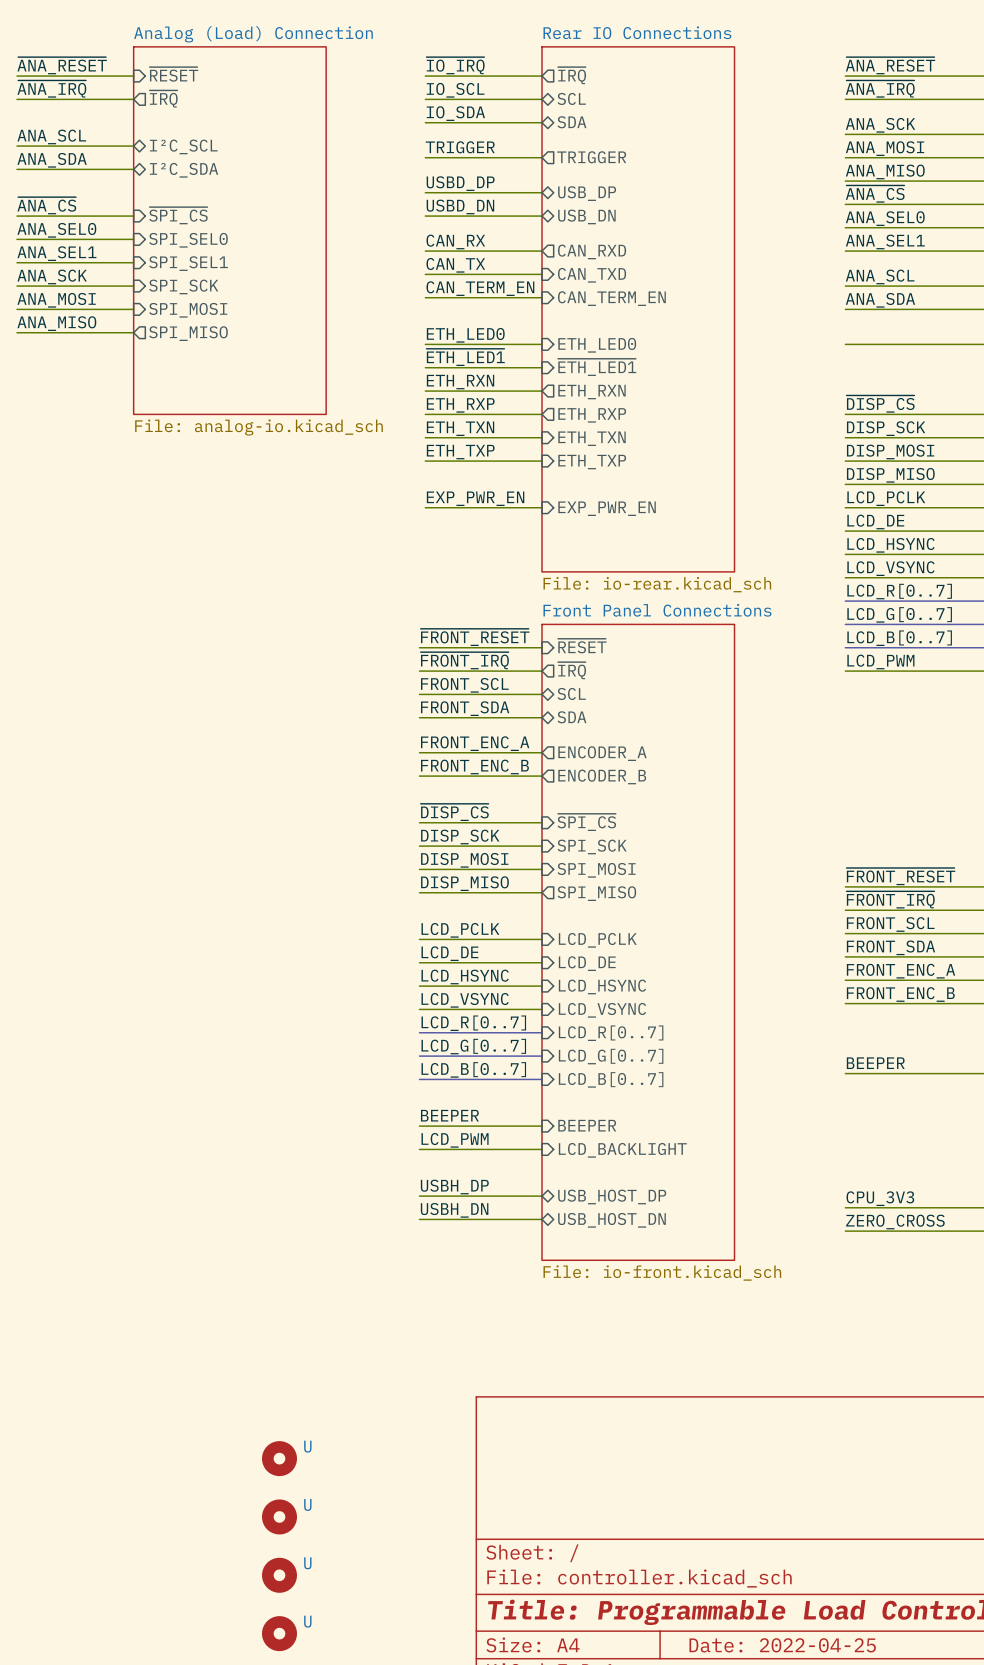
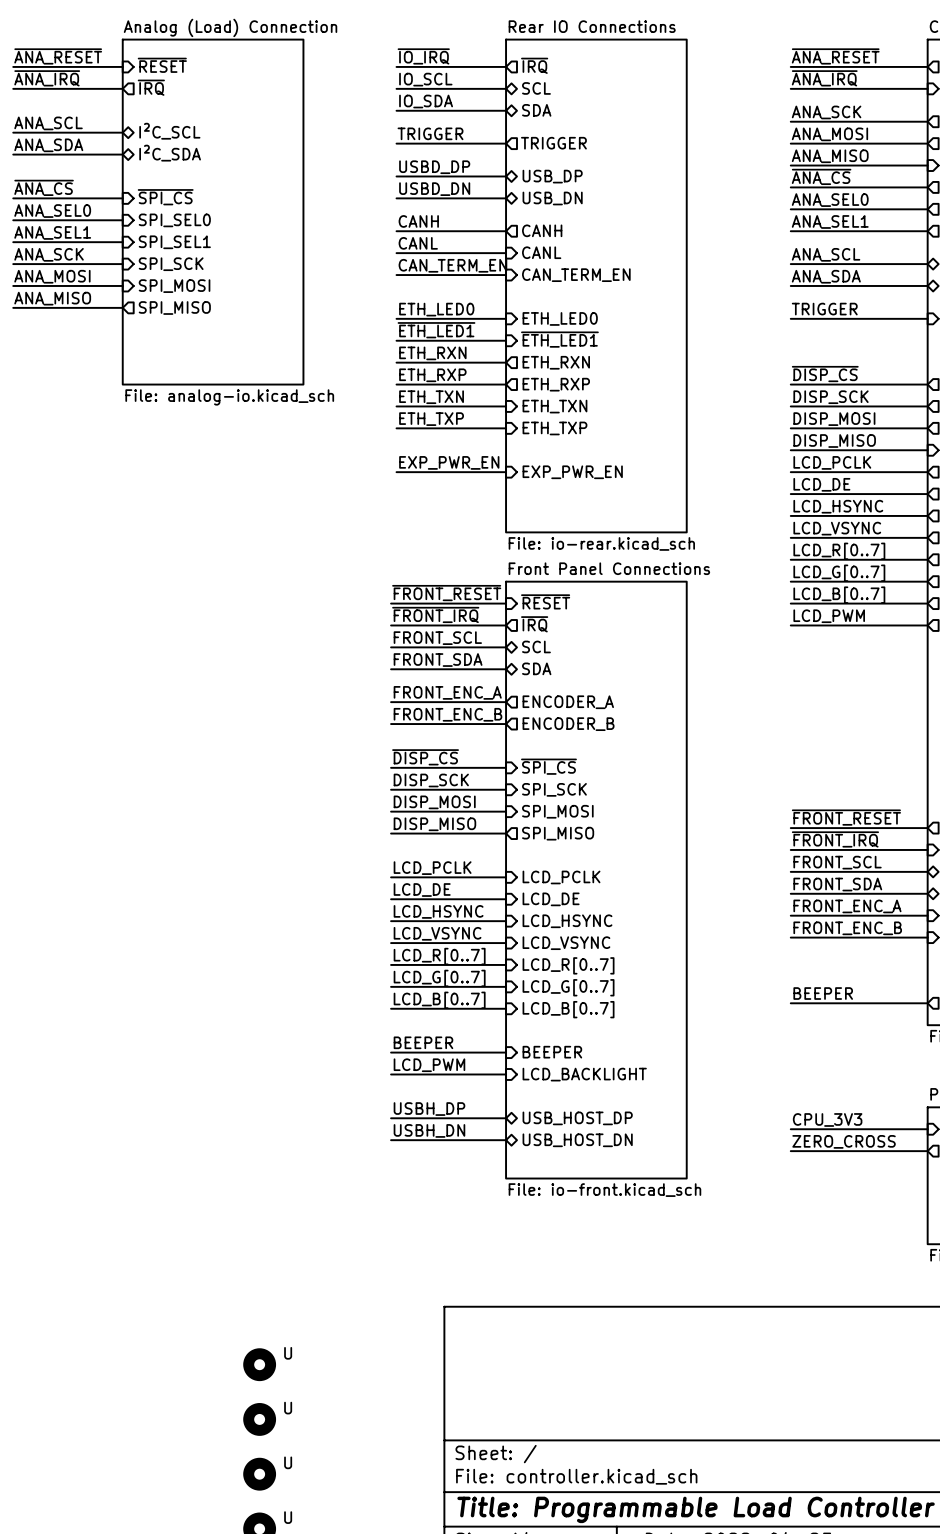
label: CAN_RX (455, 241) -> CANH (418, 221)
sheet pin: CAN_RXD (592, 251) -> CANH (542, 230)
label: CAN_TX (455, 265) -> CANL (418, 243)
sheet pin: CAN_TXD (592, 275) -> CANL (541, 252)
label: none -> TRIGGER (824, 309)

